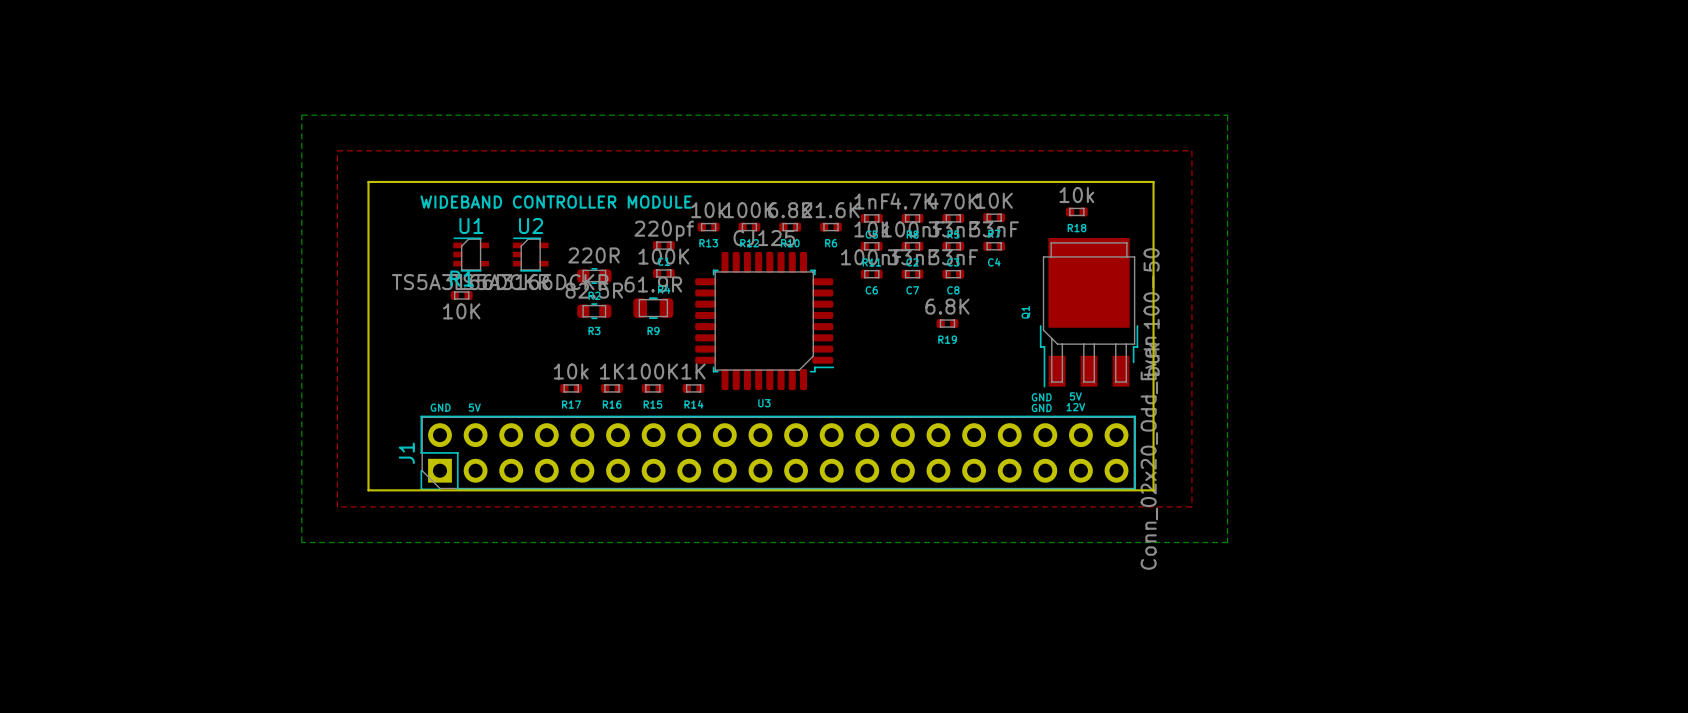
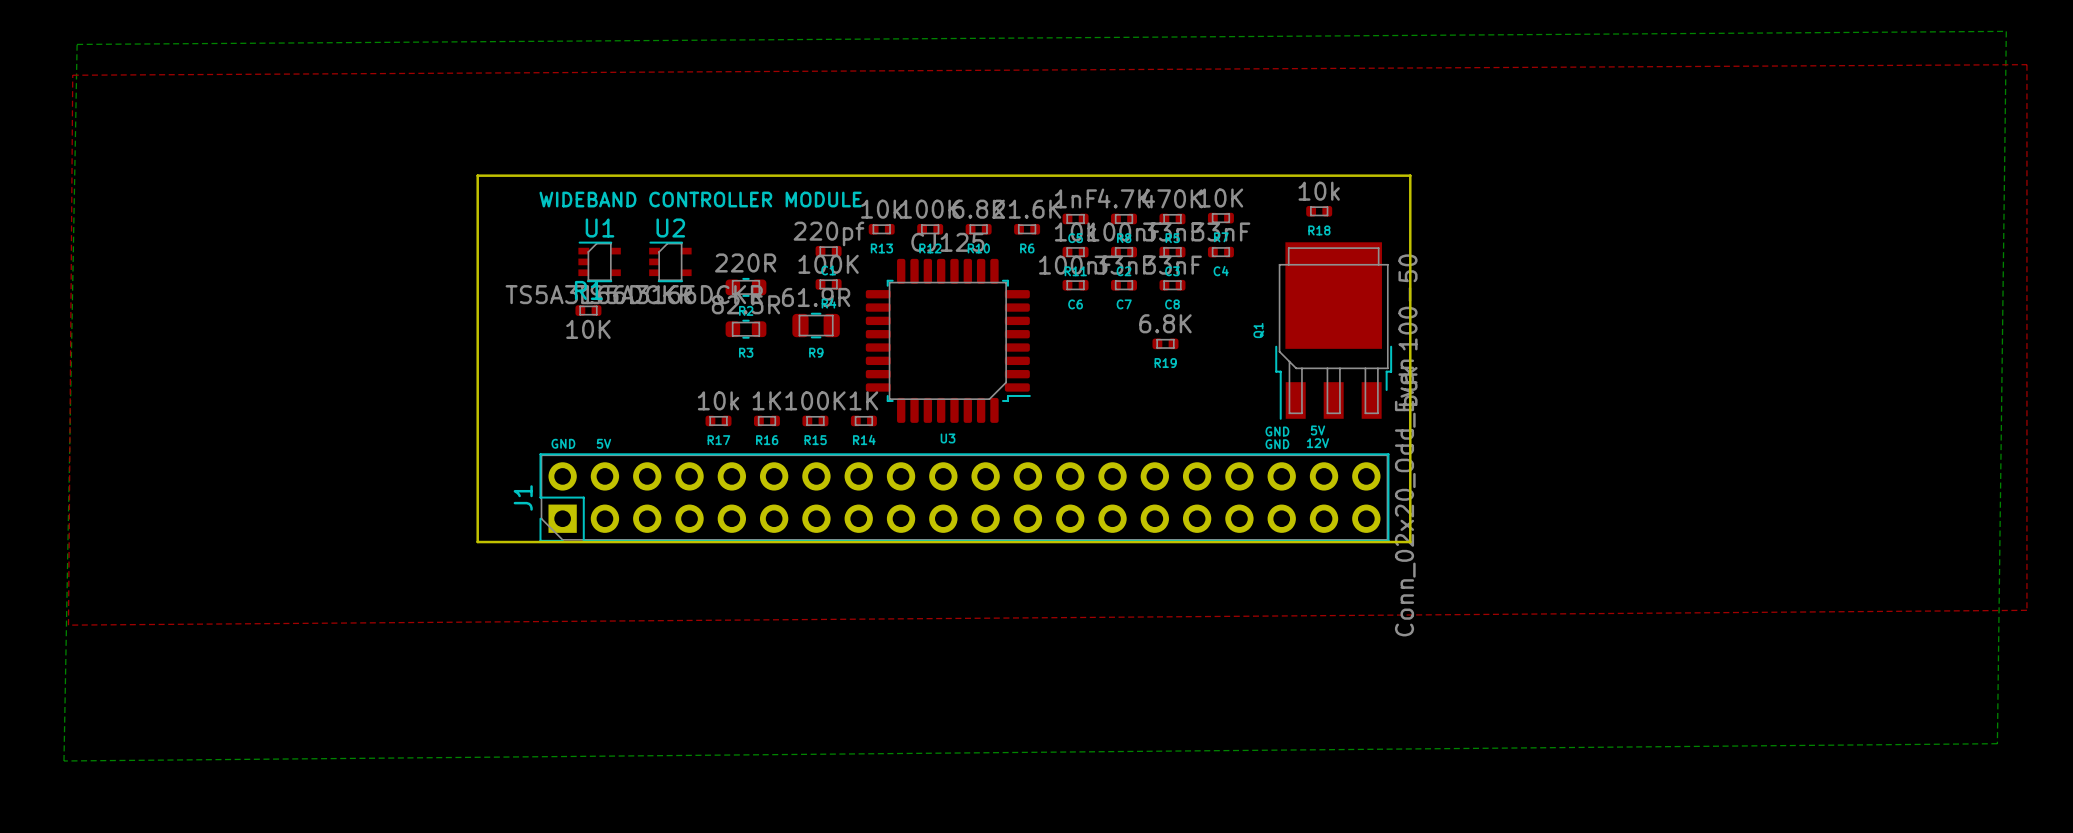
bottom zone outline: none -> (2006, 31) (77, 44) (63, 760) (1997, 743) (2006, 31)
top zone outline: none -> (2026, 64) (72, 75) (68, 625) (2026, 610) (2026, 64)
bottom zone outline: (301, 115) (1227, 115) (1227, 542) (301, 542) (301, 115) -> none
top zone outline: (337, 150) (1191, 150) (1191, 506) (337, 506) (337, 150) -> none

